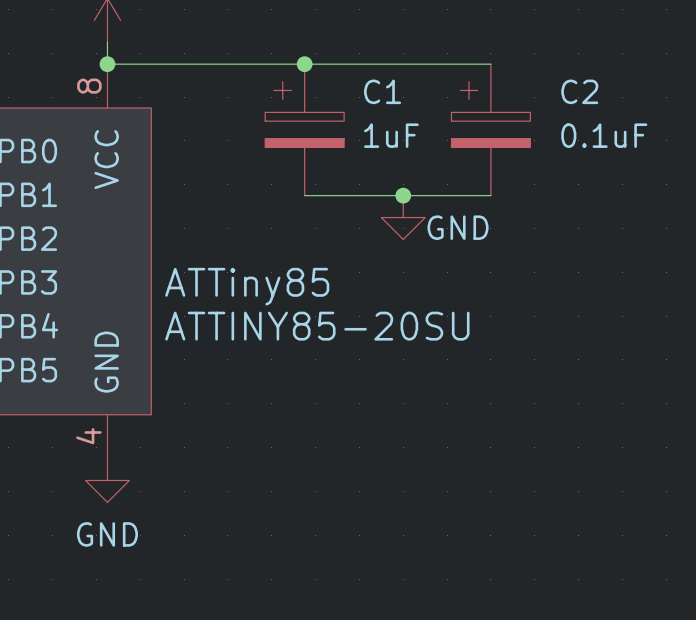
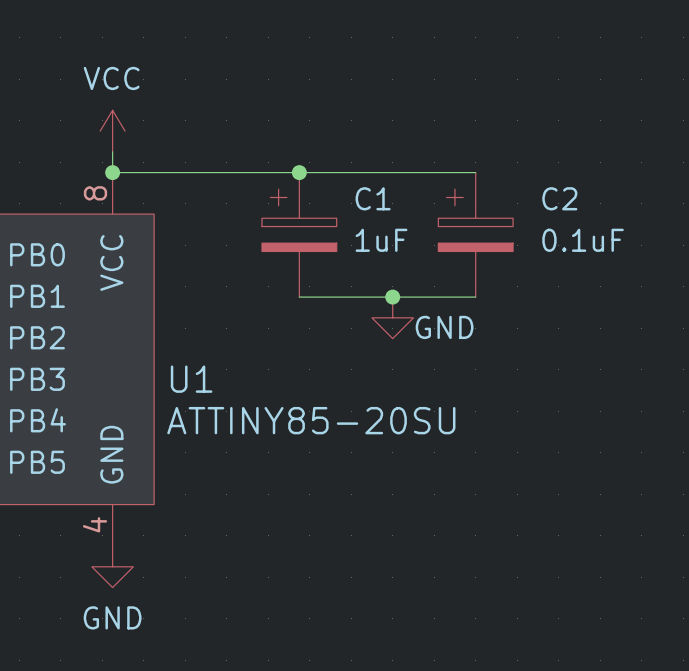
ATTiny85 name: ATTiny85 (247, 286) -> U1 (191, 379)

